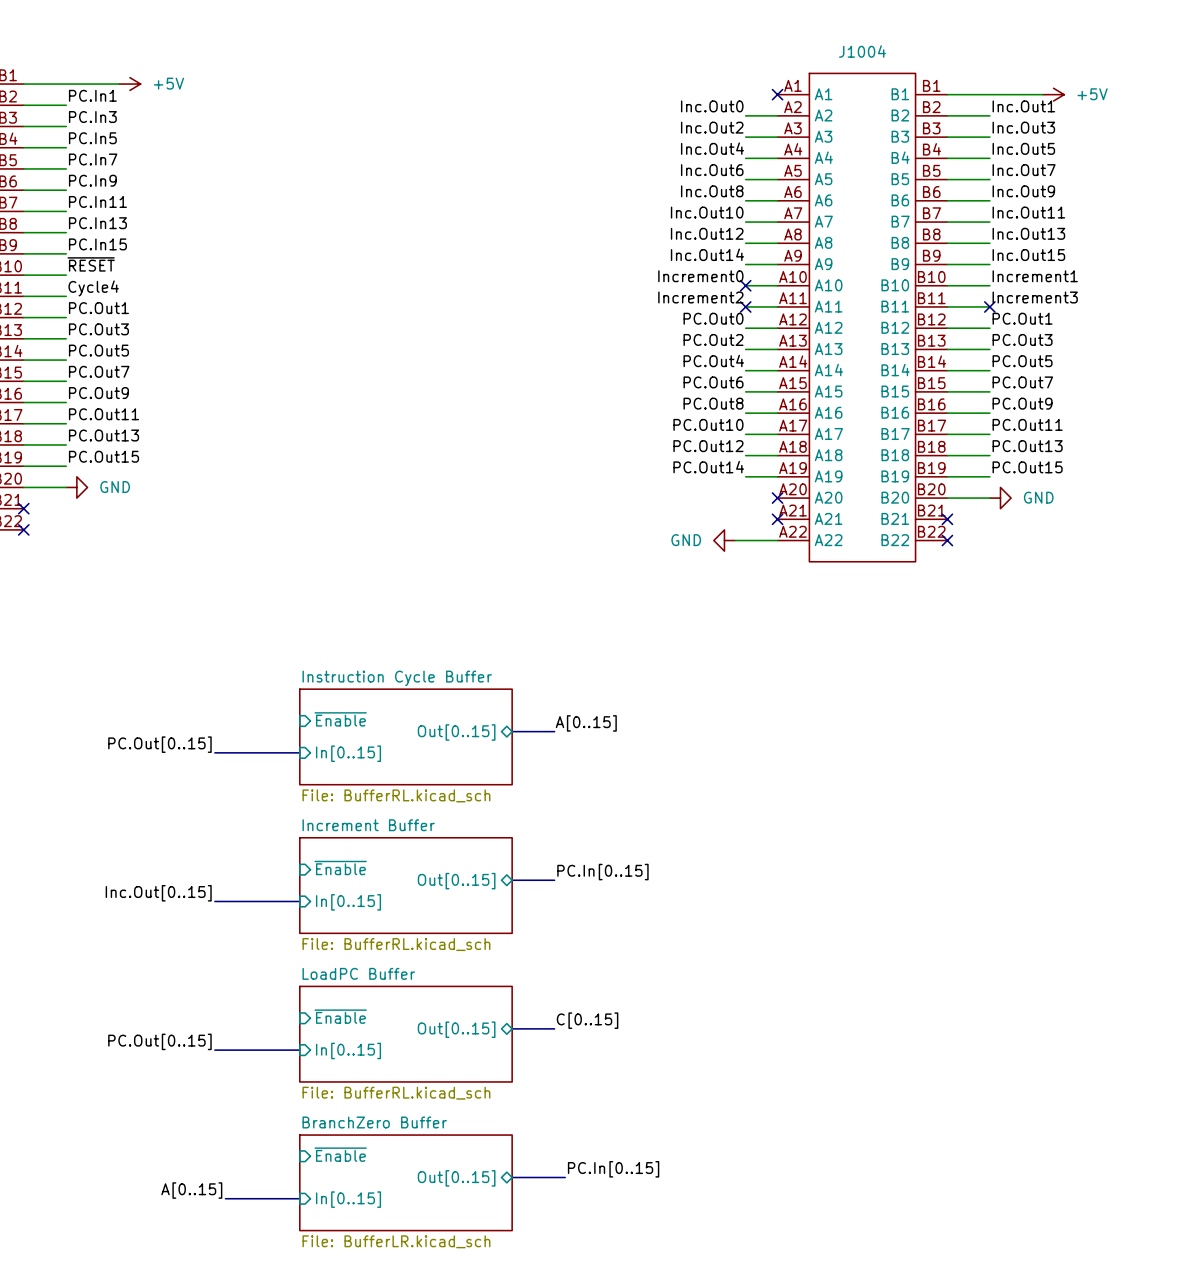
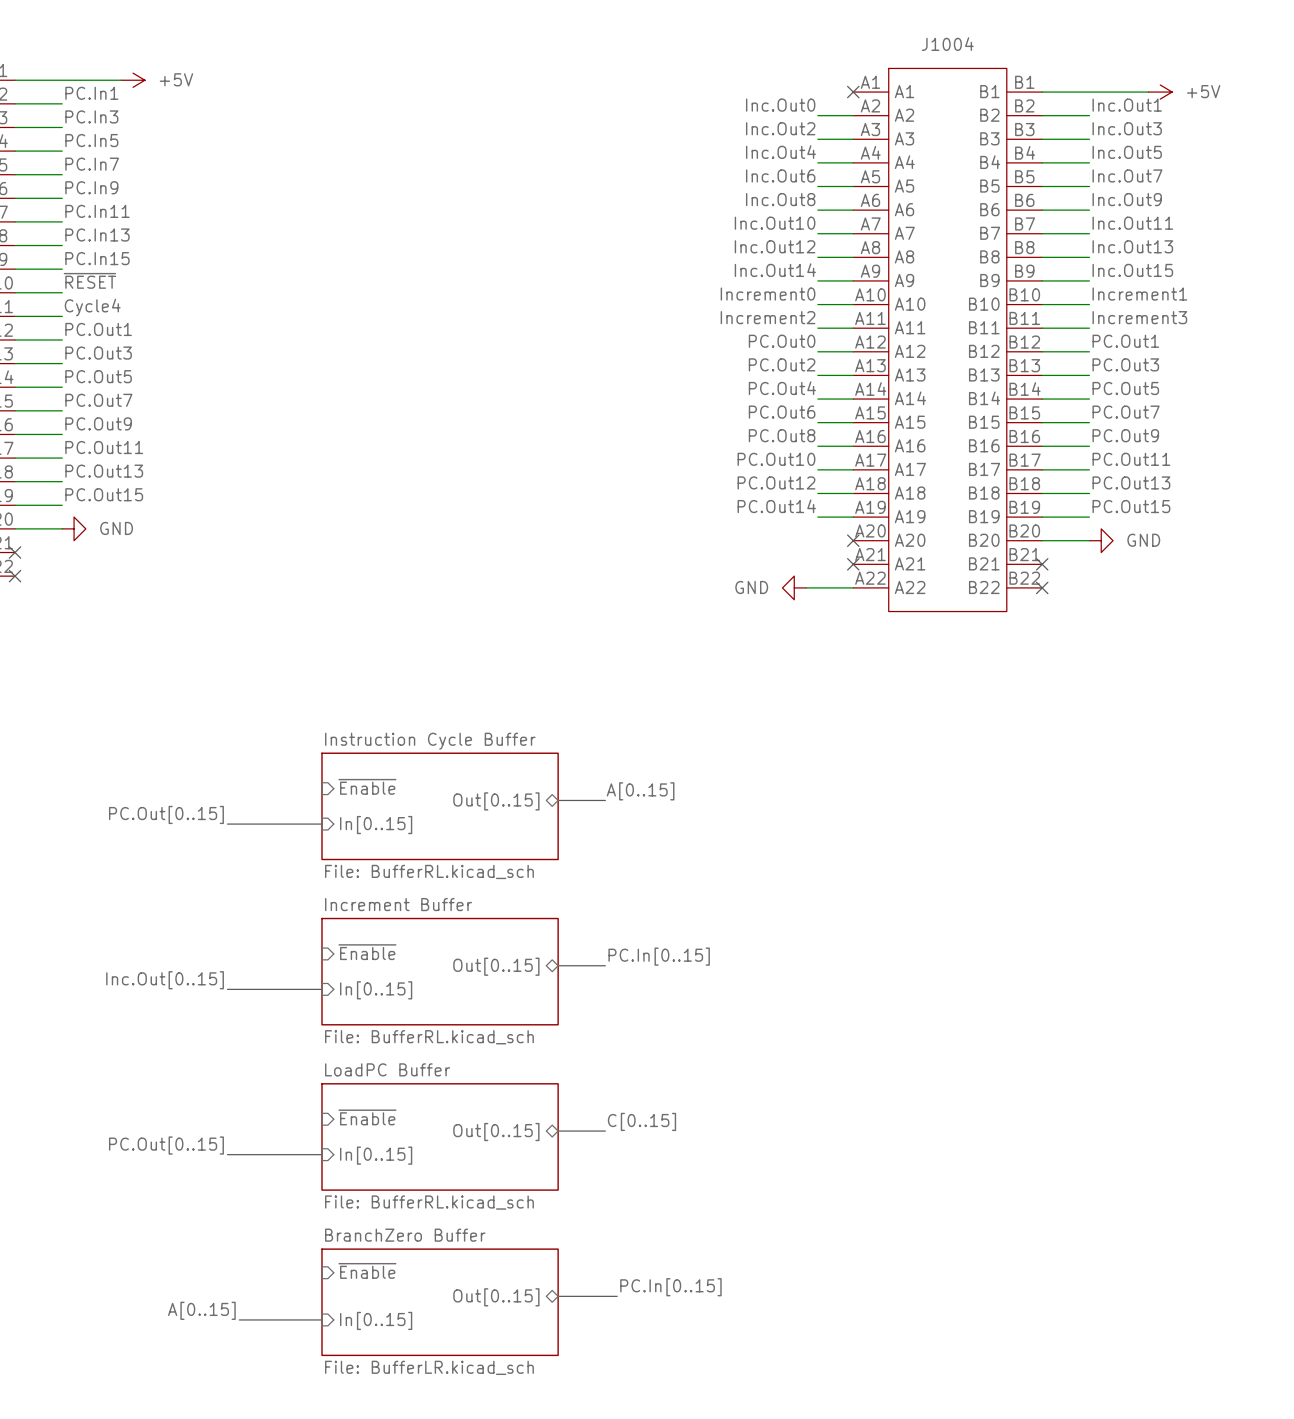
no-connect mark: (745, 285) -> none
no-connect mark: (745, 306) -> none
no-connect mark: (989, 306) -> none

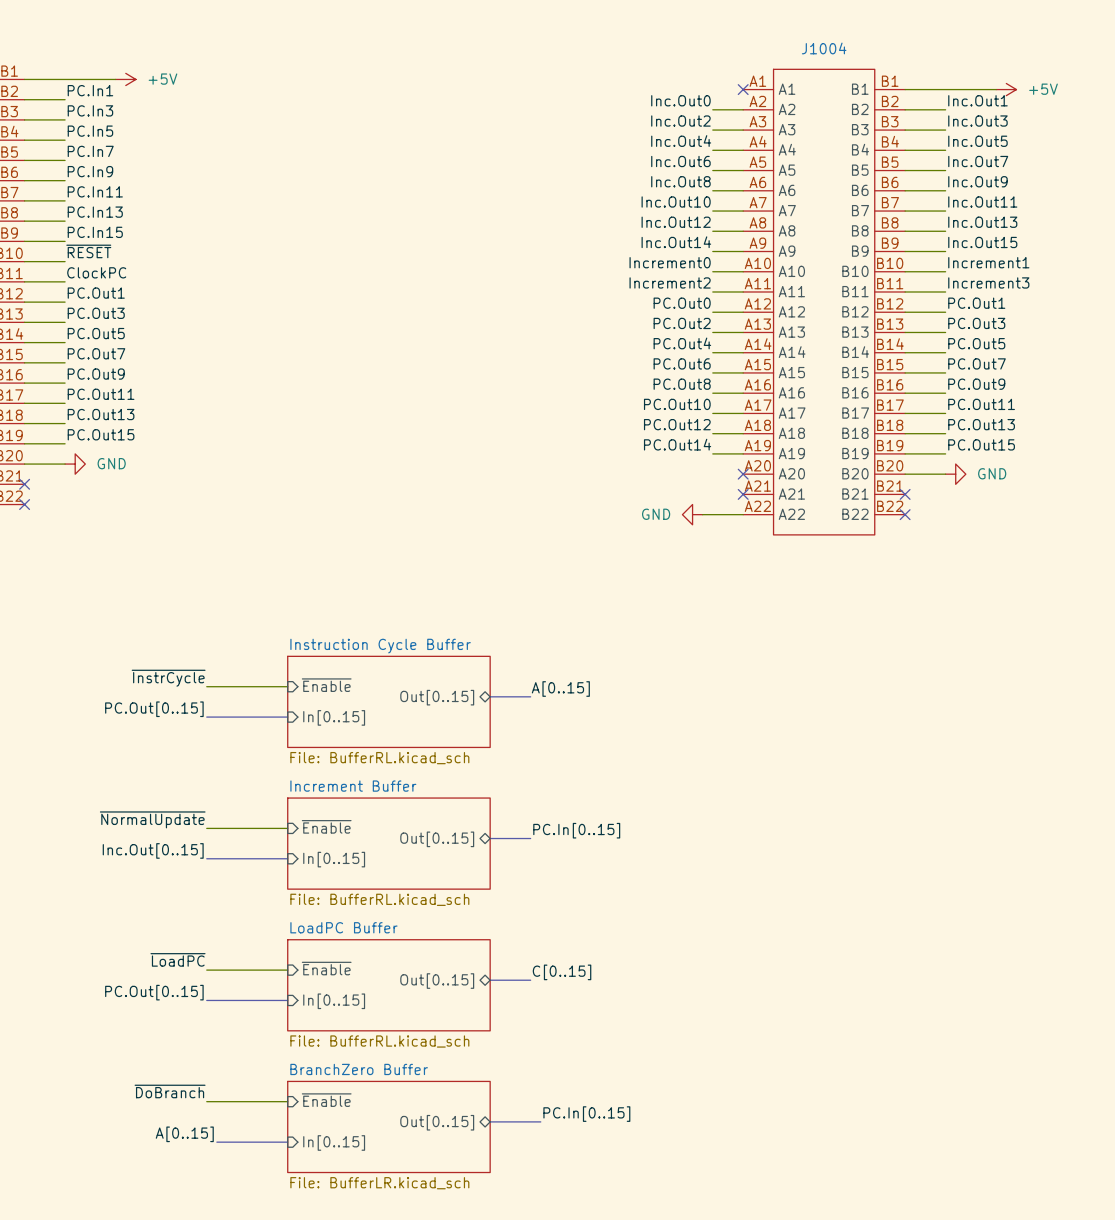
label: Cycle4 (92, 307) -> ClockPC (96, 272)
label: none -> ~{InstrCycle} (168, 678)
wire: none -> (206, 686) (287, 686)
label: none -> ~{NormalUpdate} (152, 819)
wire: none -> (206, 828) (287, 828)
label: none -> ~{LoadPC} (178, 959)
wire: none -> (206, 970) (287, 970)
label: none -> ~{DoBranch} (170, 1091)
wire: none -> (206, 1101) (287, 1101)

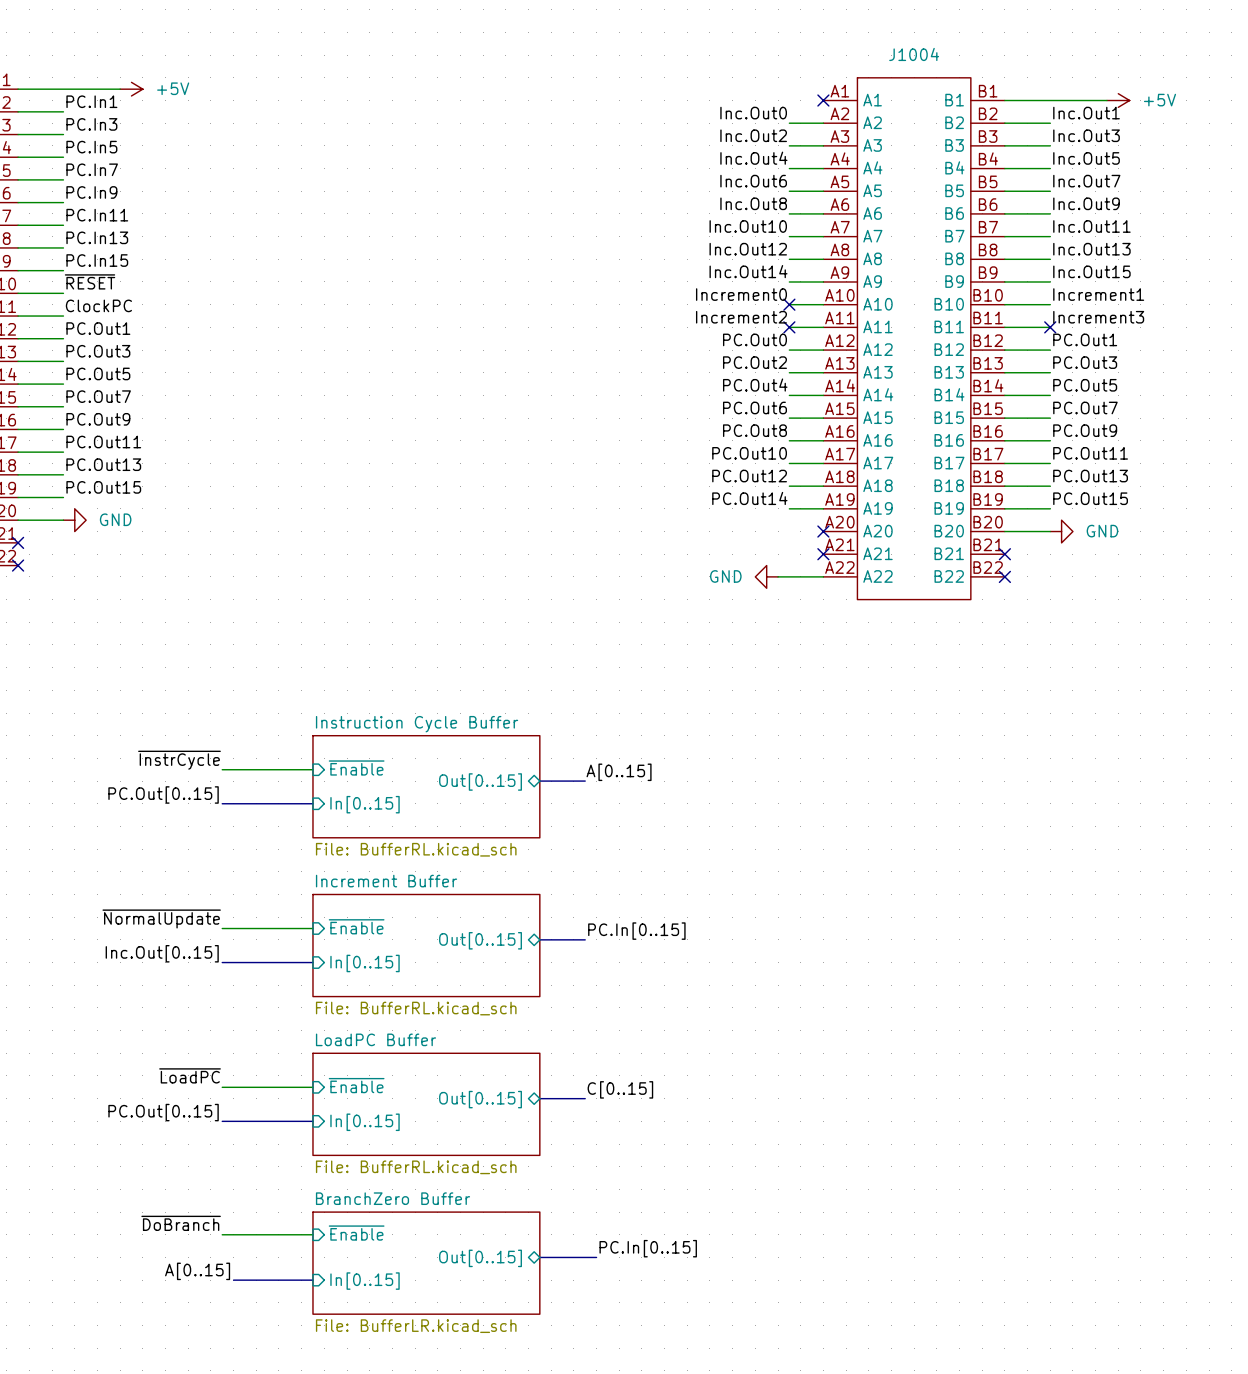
no-connect mark: none -> (789, 304)
no-connect mark: none -> (789, 327)
no-connect mark: none -> (1050, 327)

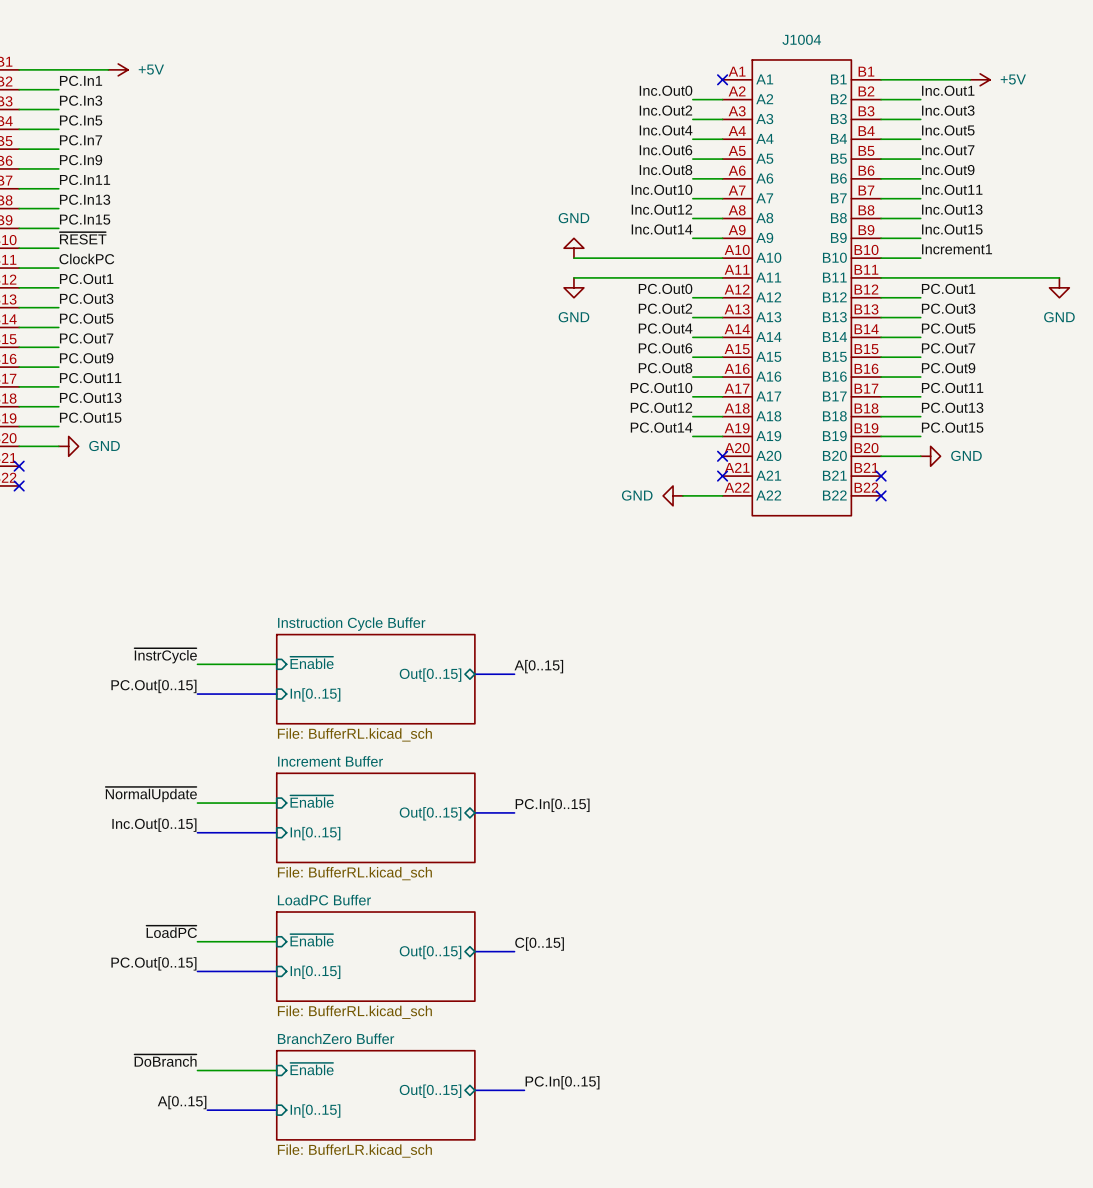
power symbol: none -> GND (573, 248)
label: Increment0 (741, 294) -> none
wire: none -> (573, 258) (692, 258)
no-connect mark: (789, 304) -> none
label: Increment2 (741, 317) -> none
label: Increment3 (1098, 317) -> none
wire: none -> (573, 277) (692, 277)
no-connect mark: (789, 327) -> none
wire: none -> (920, 277) (1059, 277)
no-connect mark: (1050, 327) -> none
power symbol: none -> GND (573, 287)
power symbol: none -> GND (1059, 287)

